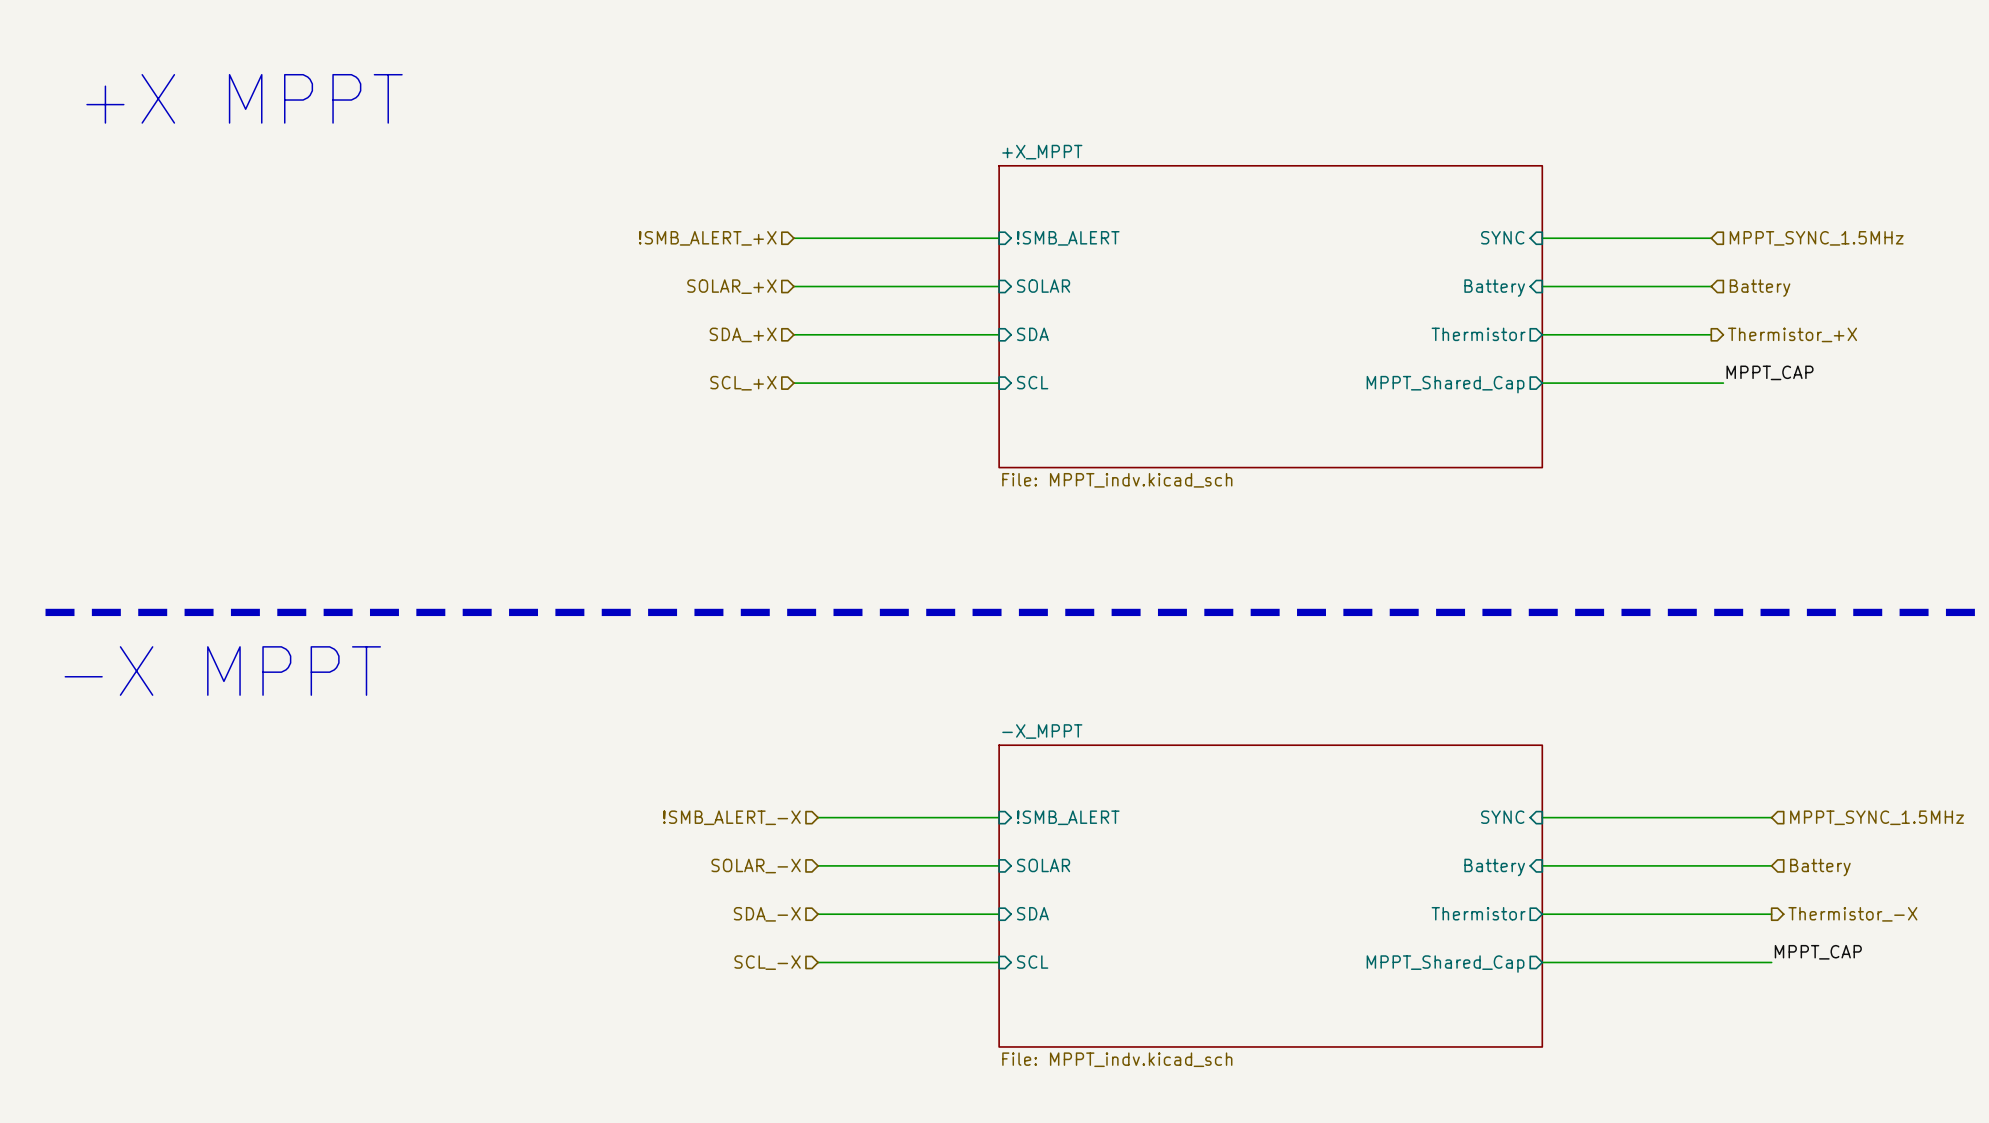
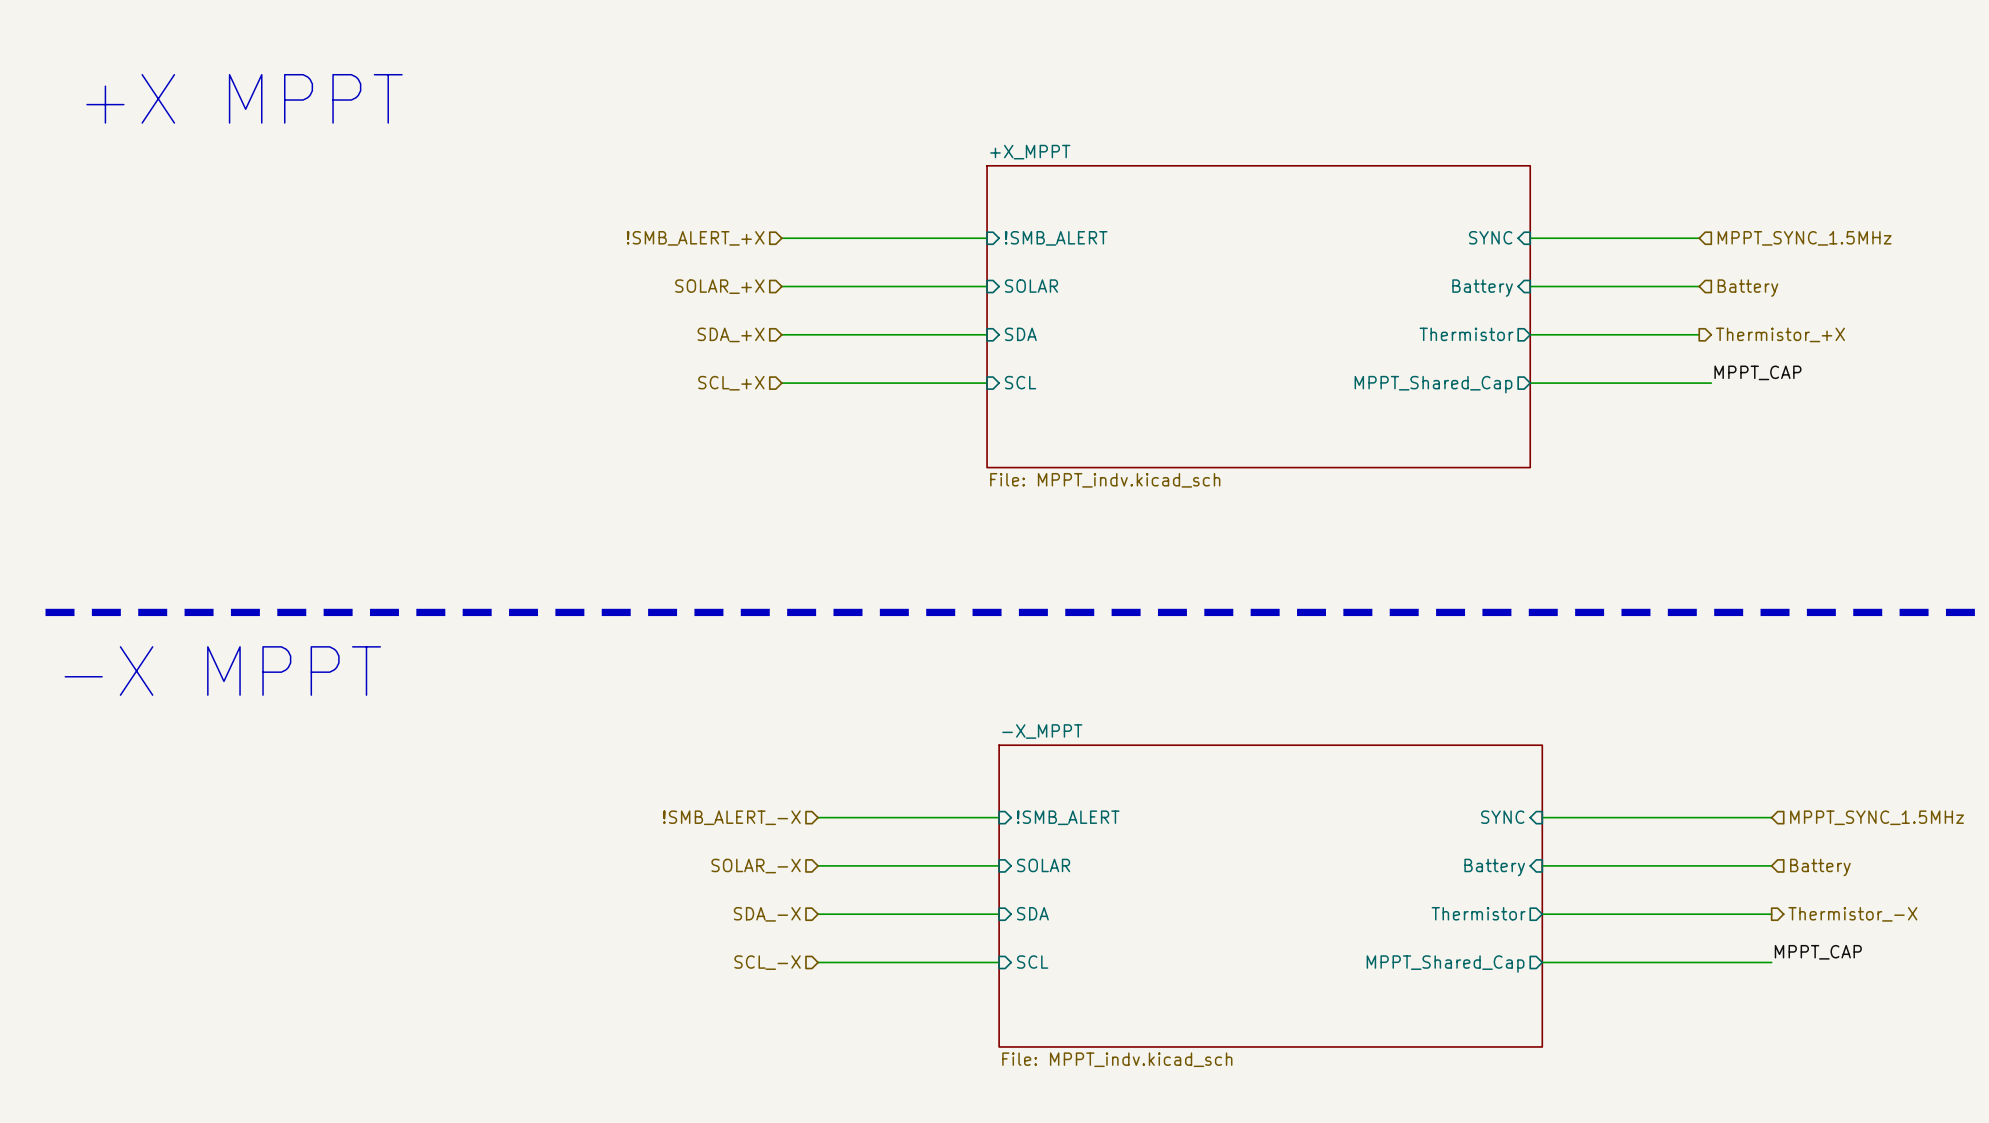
sheet pin position: SYNC (1502, 237) -> SYNC (1490, 237)
hierarchical label position: !SMB_ALERT_+X (707, 238) -> !SMB_ALERT_+X (695, 238)
wire: (987, 238) (999, 238) -> (781, 238) (793, 238)
sheet pin position: !SMB_ALERT (1068, 238) -> !SMB_ALERT (1056, 238)
wire: (1699, 238) (1711, 238) -> (1530, 238) (1542, 238)
hierarchical label position: MPPT_SYNC_1.5MHz (1816, 238) -> MPPT_SYNC_1.5MHz (1804, 238)
hierarchical label position: SOLAR_+X (731, 286) -> SOLAR_+X (719, 286)
wire: (987, 286) (999, 286) -> (781, 286) (793, 286)
sheet pin position: SOLAR (1043, 286) -> SOLAR (1031, 286)
wire: (1699, 286) (1711, 286) -> (1530, 286) (1542, 286)
sheet pin position: Battery (1494, 288) -> Battery (1482, 288)
hierarchical label position: Battery (1760, 288) -> Battery (1747, 288)
sheet +X_MPPT position: (1270, 316) -> (1258, 316)
hierarchical label position: SDA_+X (743, 334) -> SDA_+X (731, 334)
wire: (987, 334) (999, 334) -> (781, 334) (793, 334)
sheet pin position: SDA (1032, 334) -> SDA (1020, 334)
sheet pin position: Thermistor (1478, 334) -> Thermistor (1466, 334)
wire: (1699, 334) (1711, 334) -> (1530, 334) (1542, 334)
hierarchical label position: Thermistor_+X (1792, 334) -> Thermistor_+X (1780, 334)
label position: MPPT_CAP (1770, 372) -> MPPT_CAP (1757, 372)
sheet pin position: SCL (1032, 382) -> SCL (1020, 382)
hierarchical label position: SCL_+X (743, 383) -> SCL_+X (731, 383)
wire: (987, 383) (999, 383) -> (781, 383) (793, 383)
wire: (1711, 383) (1723, 383) -> (1530, 383) (1542, 383)
sheet pin position: MPPT_Shared_Cap (1445, 384) -> MPPT_Shared_Cap (1433, 384)

